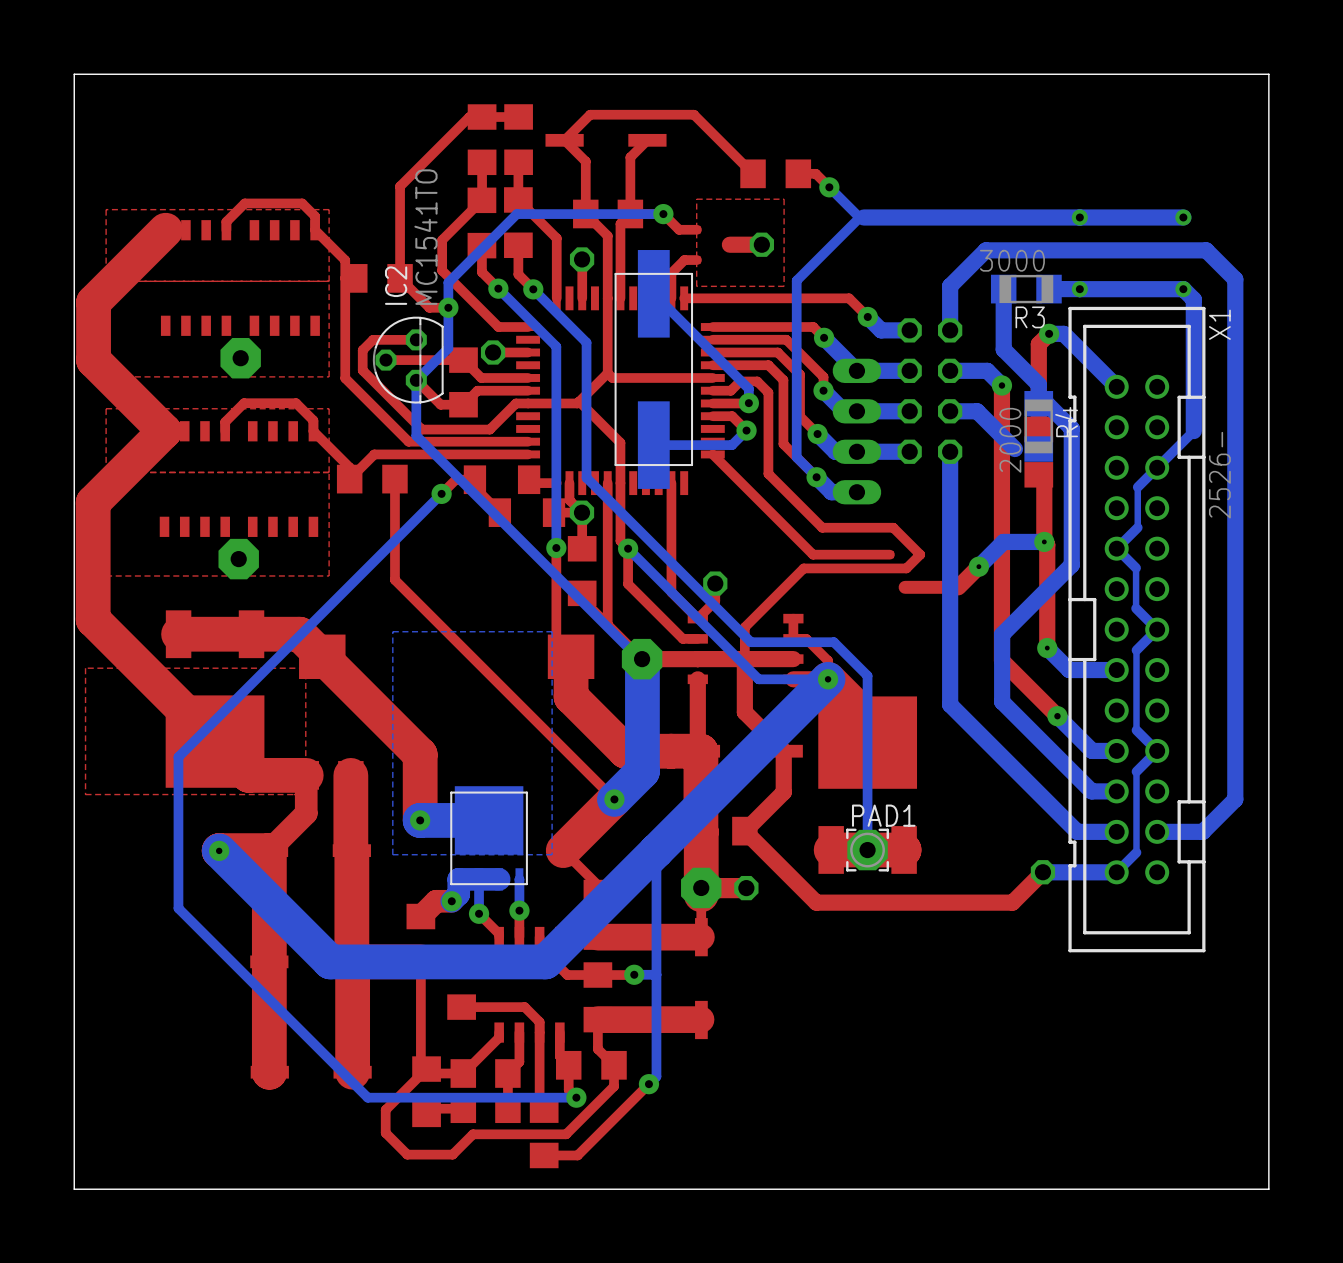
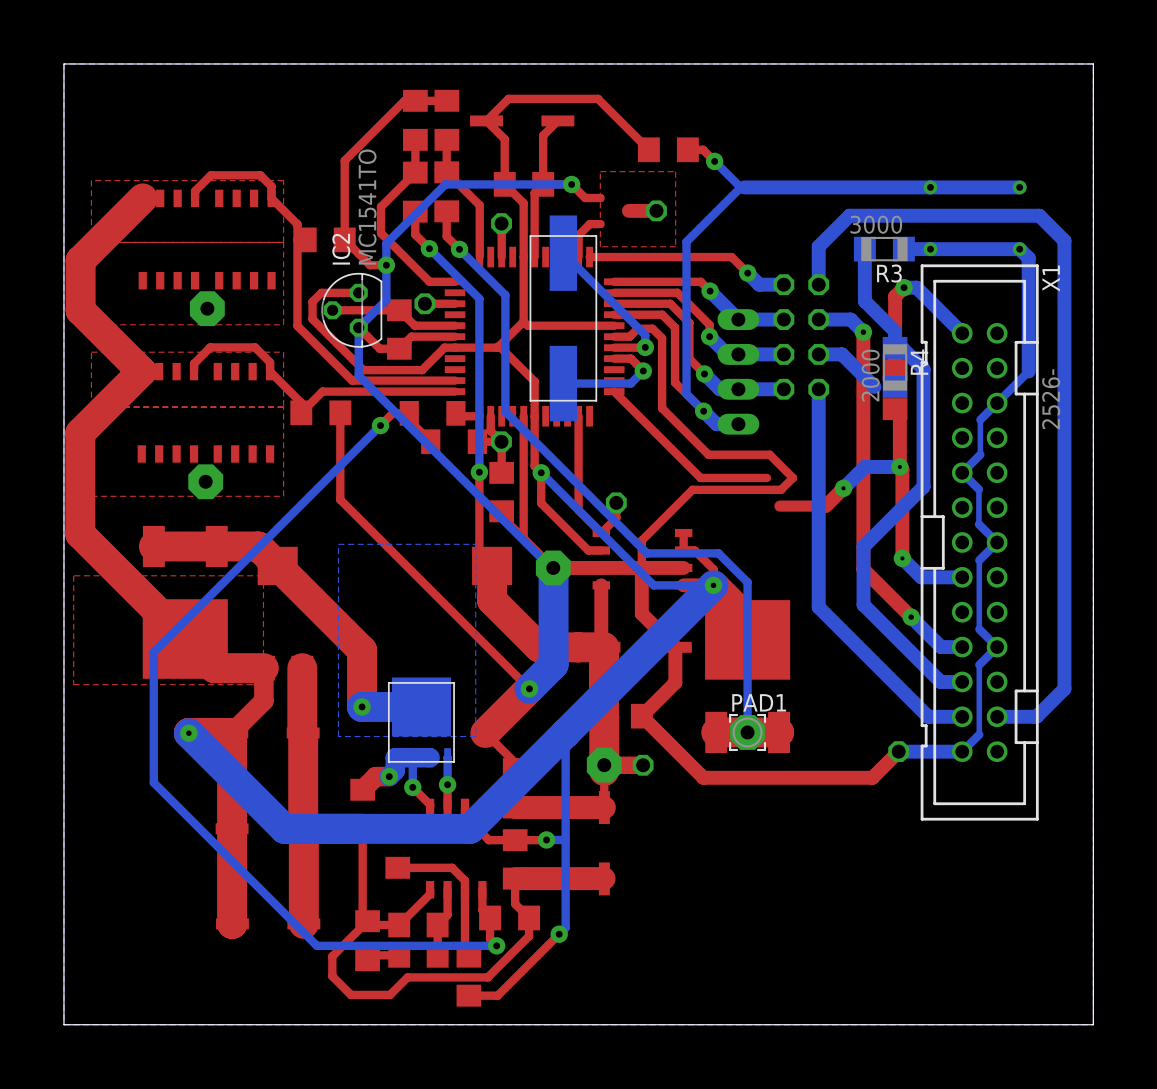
bottom zone outline: none -> (1093, 63) (63, 63) (63, 1024) (1093, 1024) (1093, 63)

